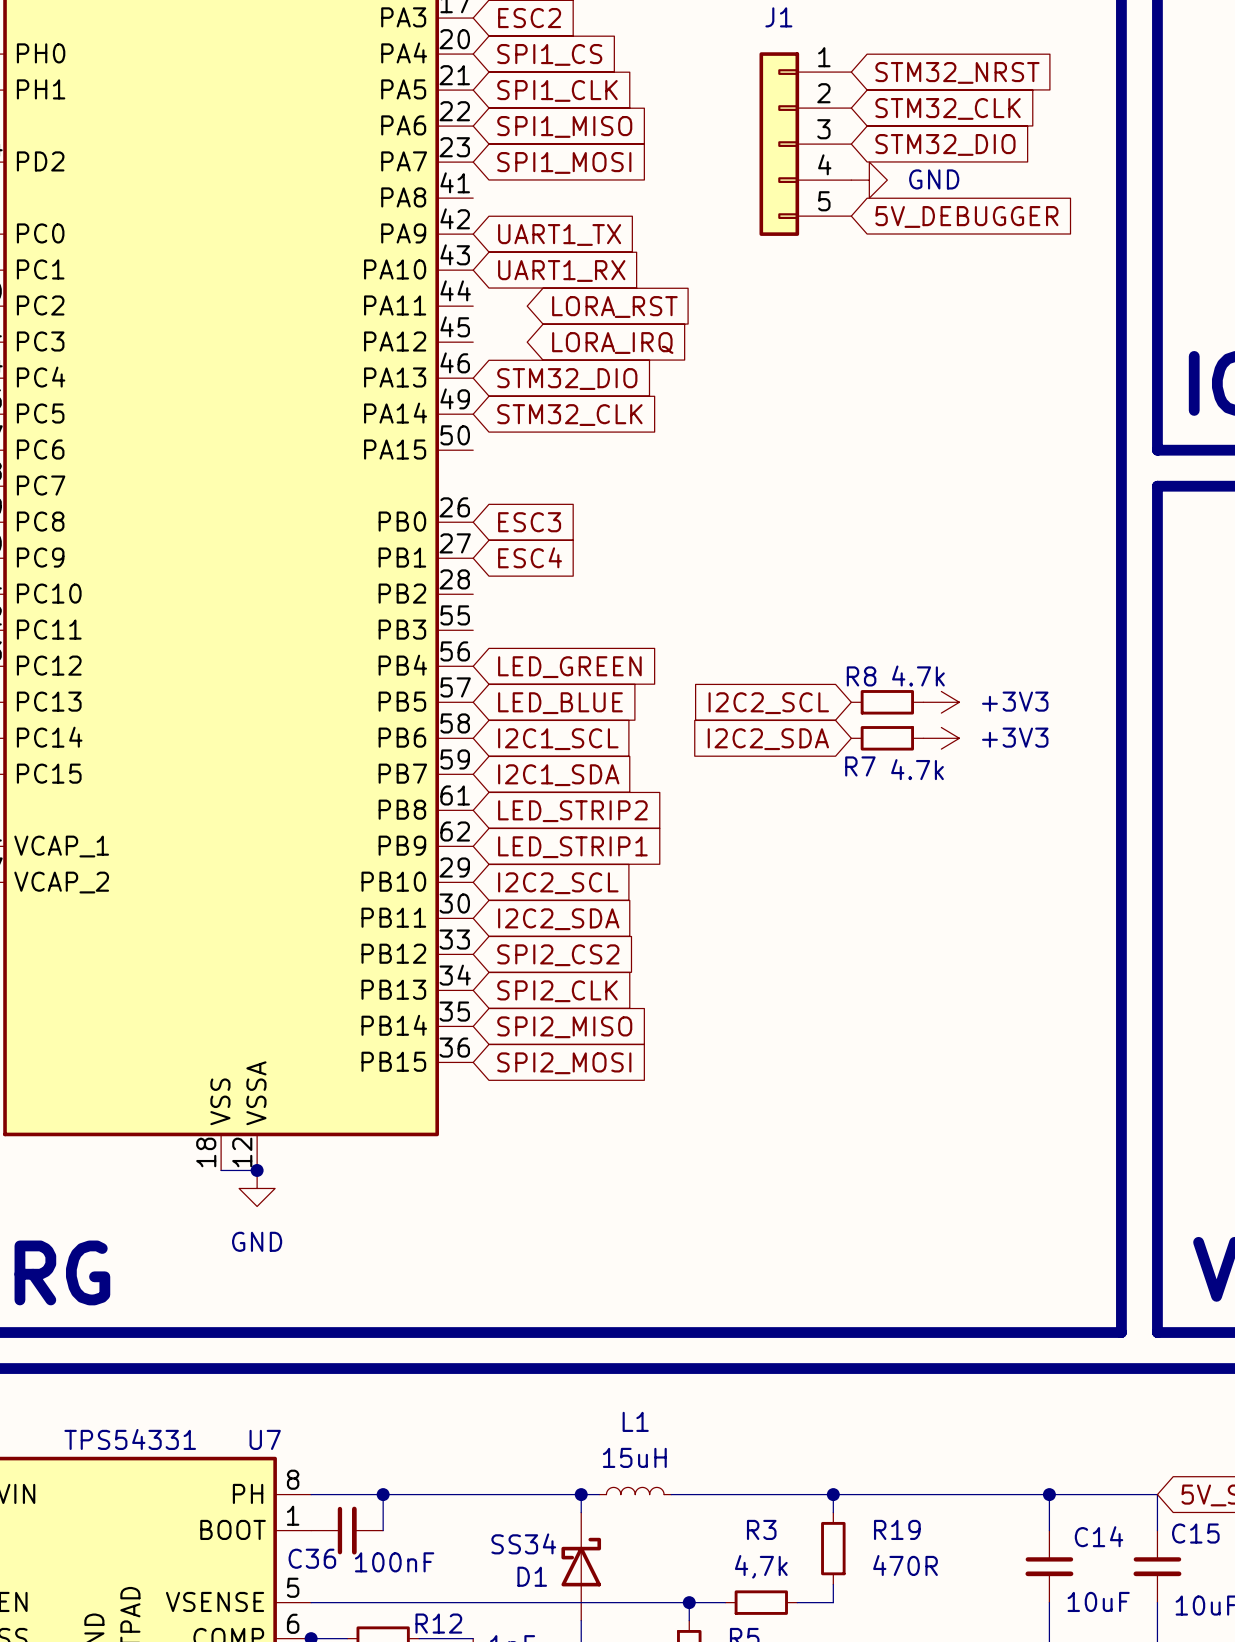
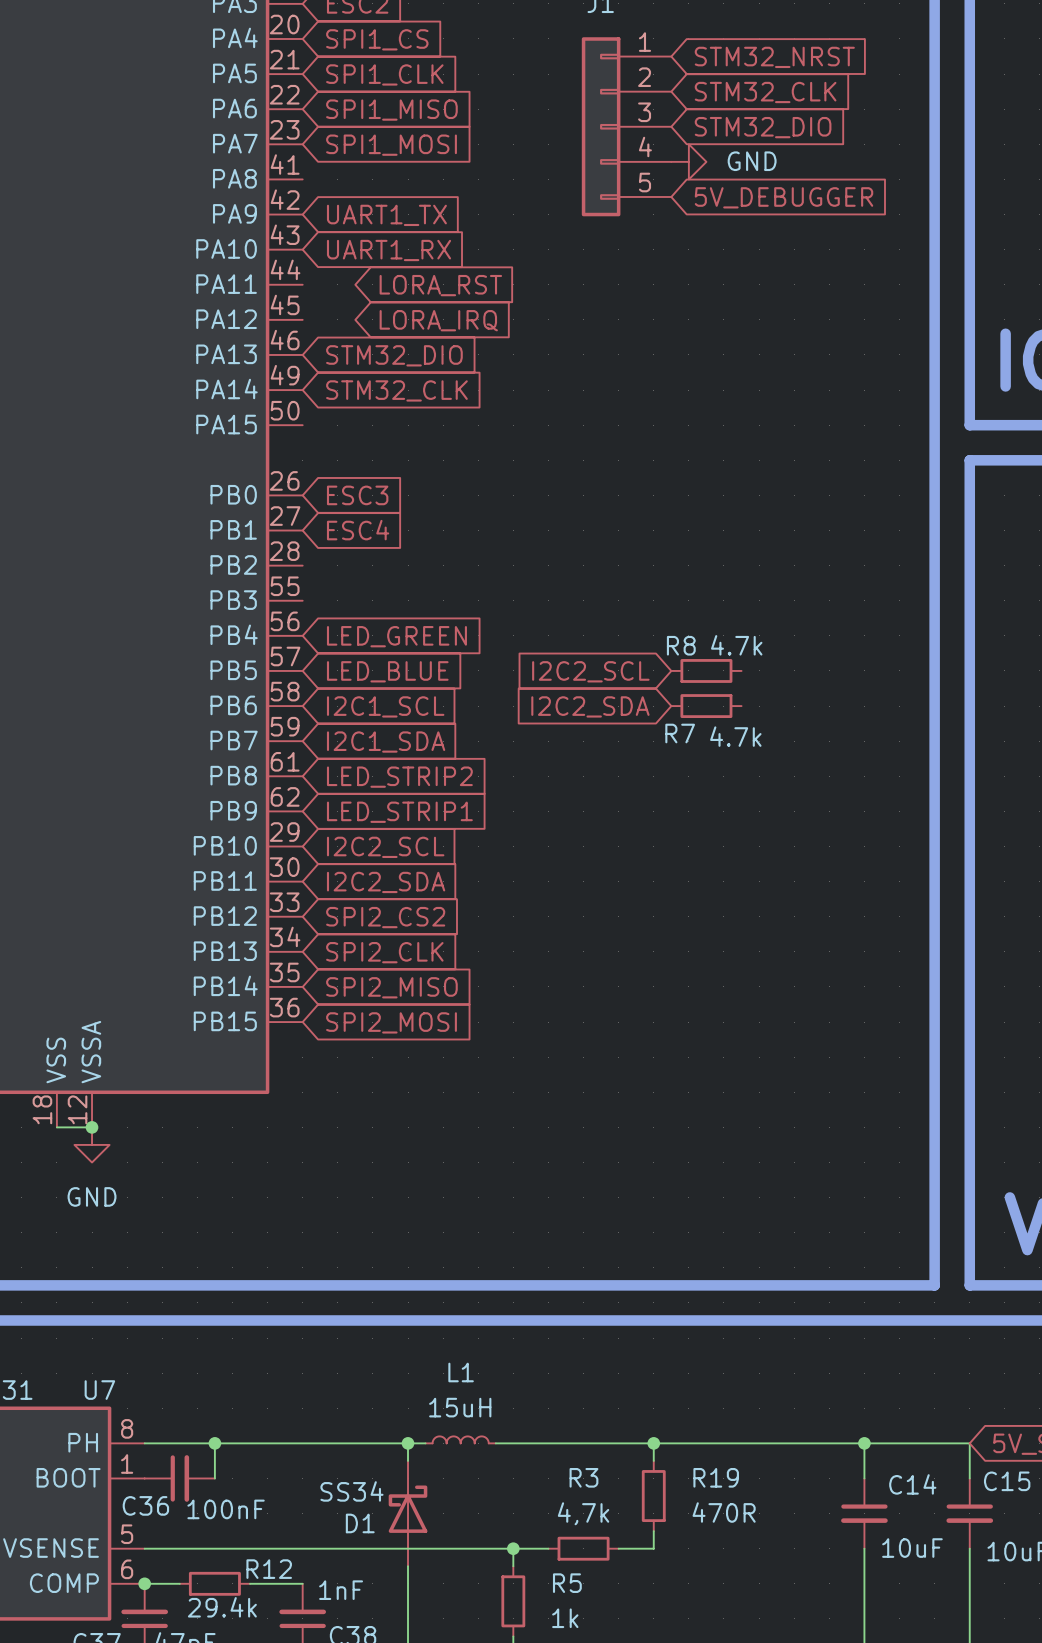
power symbol: +3V3 (941, 702) -> none
power symbol: +3V3 (941, 738) -> none

